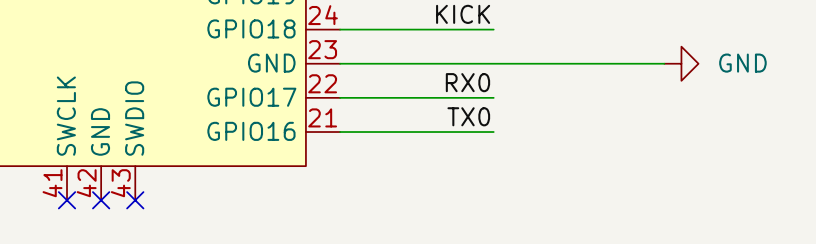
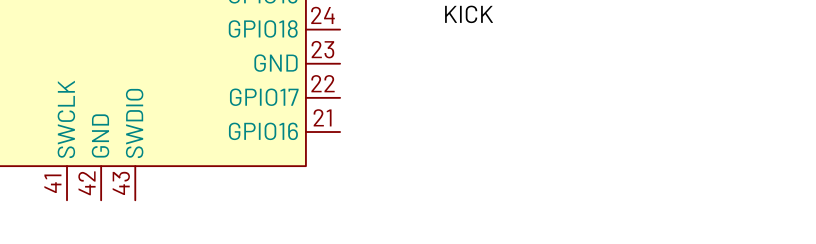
wire: (340, 29) (493, 29) -> none
wire: (340, 63) (664, 63) -> none
power symbol: GND (681, 63) -> none
label: RX0 (467, 82) -> none
wire: (340, 97) (493, 97) -> none
label: TX0 (468, 116) -> none
wire: (340, 132) (493, 132) -> none
no-connect mark: (67, 200) -> none
no-connect mark: (101, 200) -> none
no-connect mark: (135, 200) -> none

